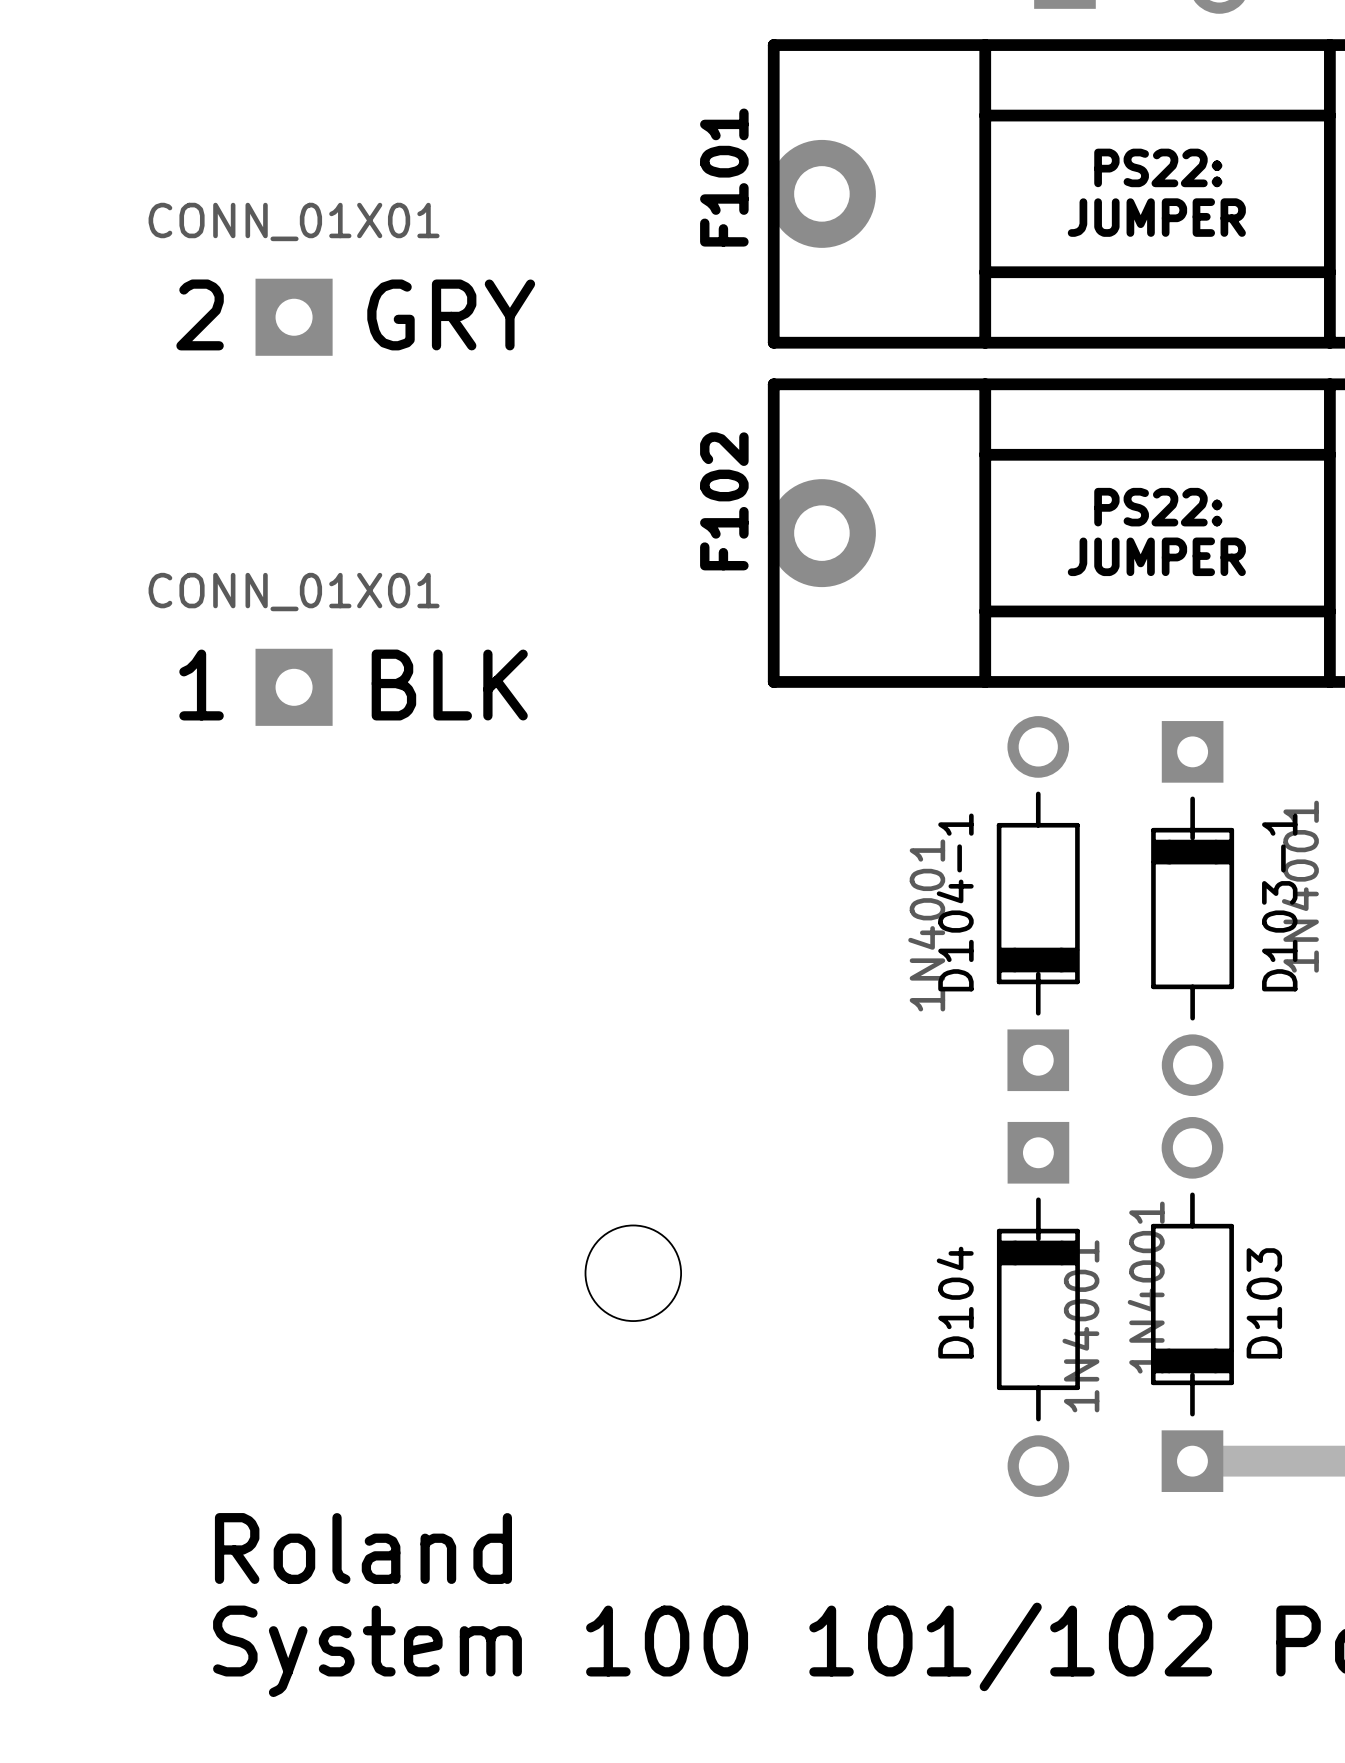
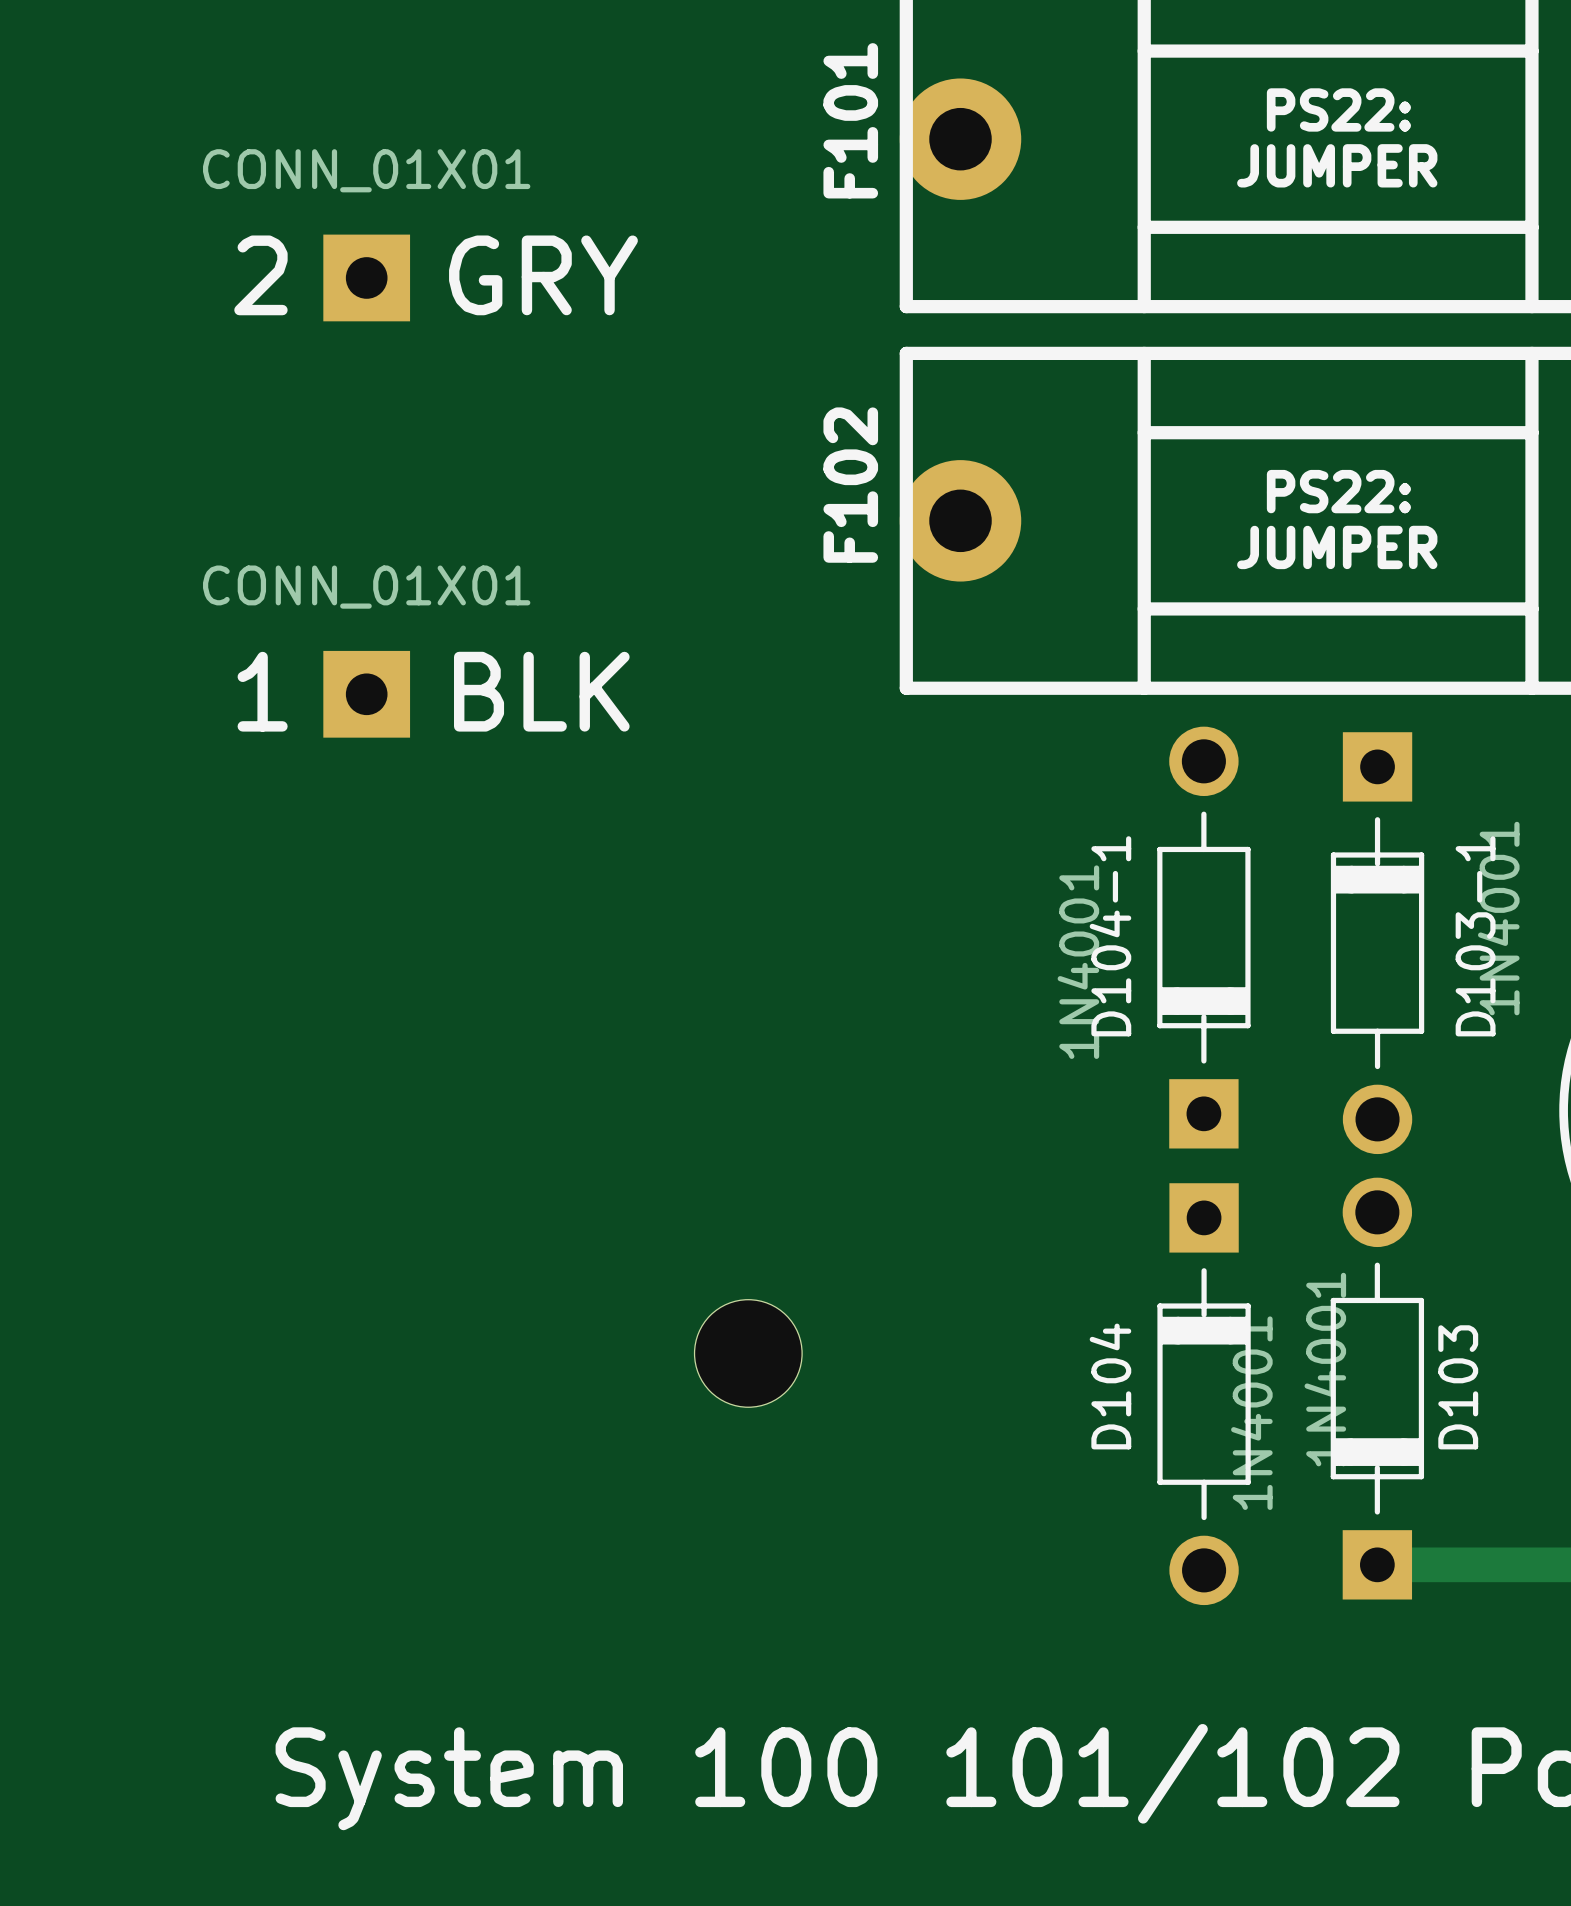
text: Roland (363, 1548) -> none

